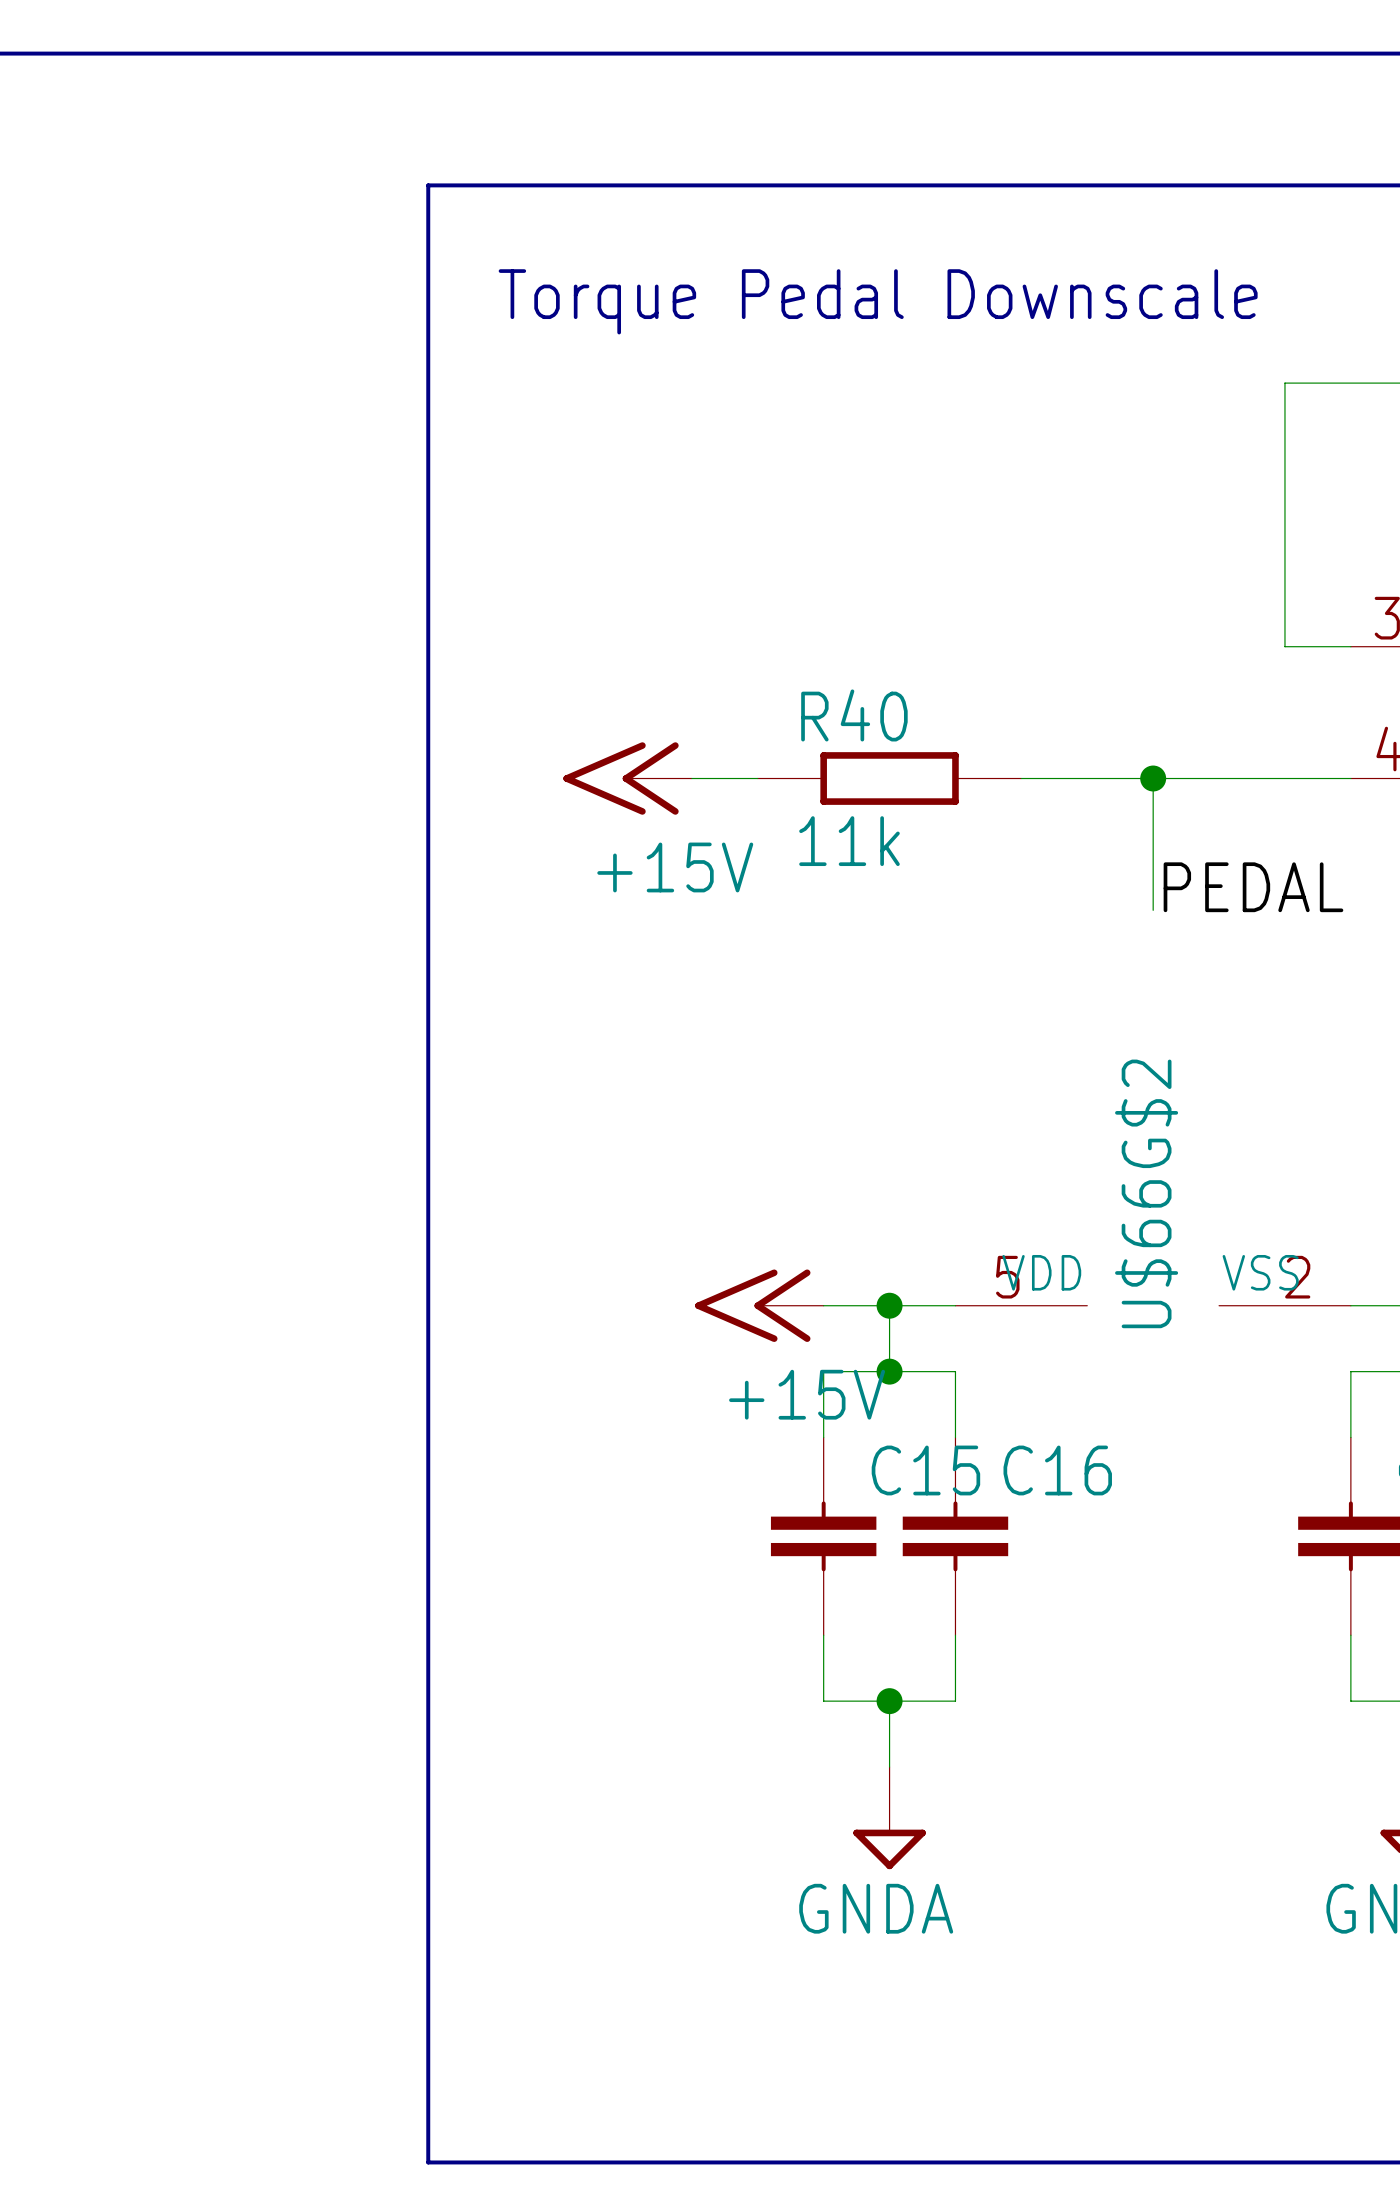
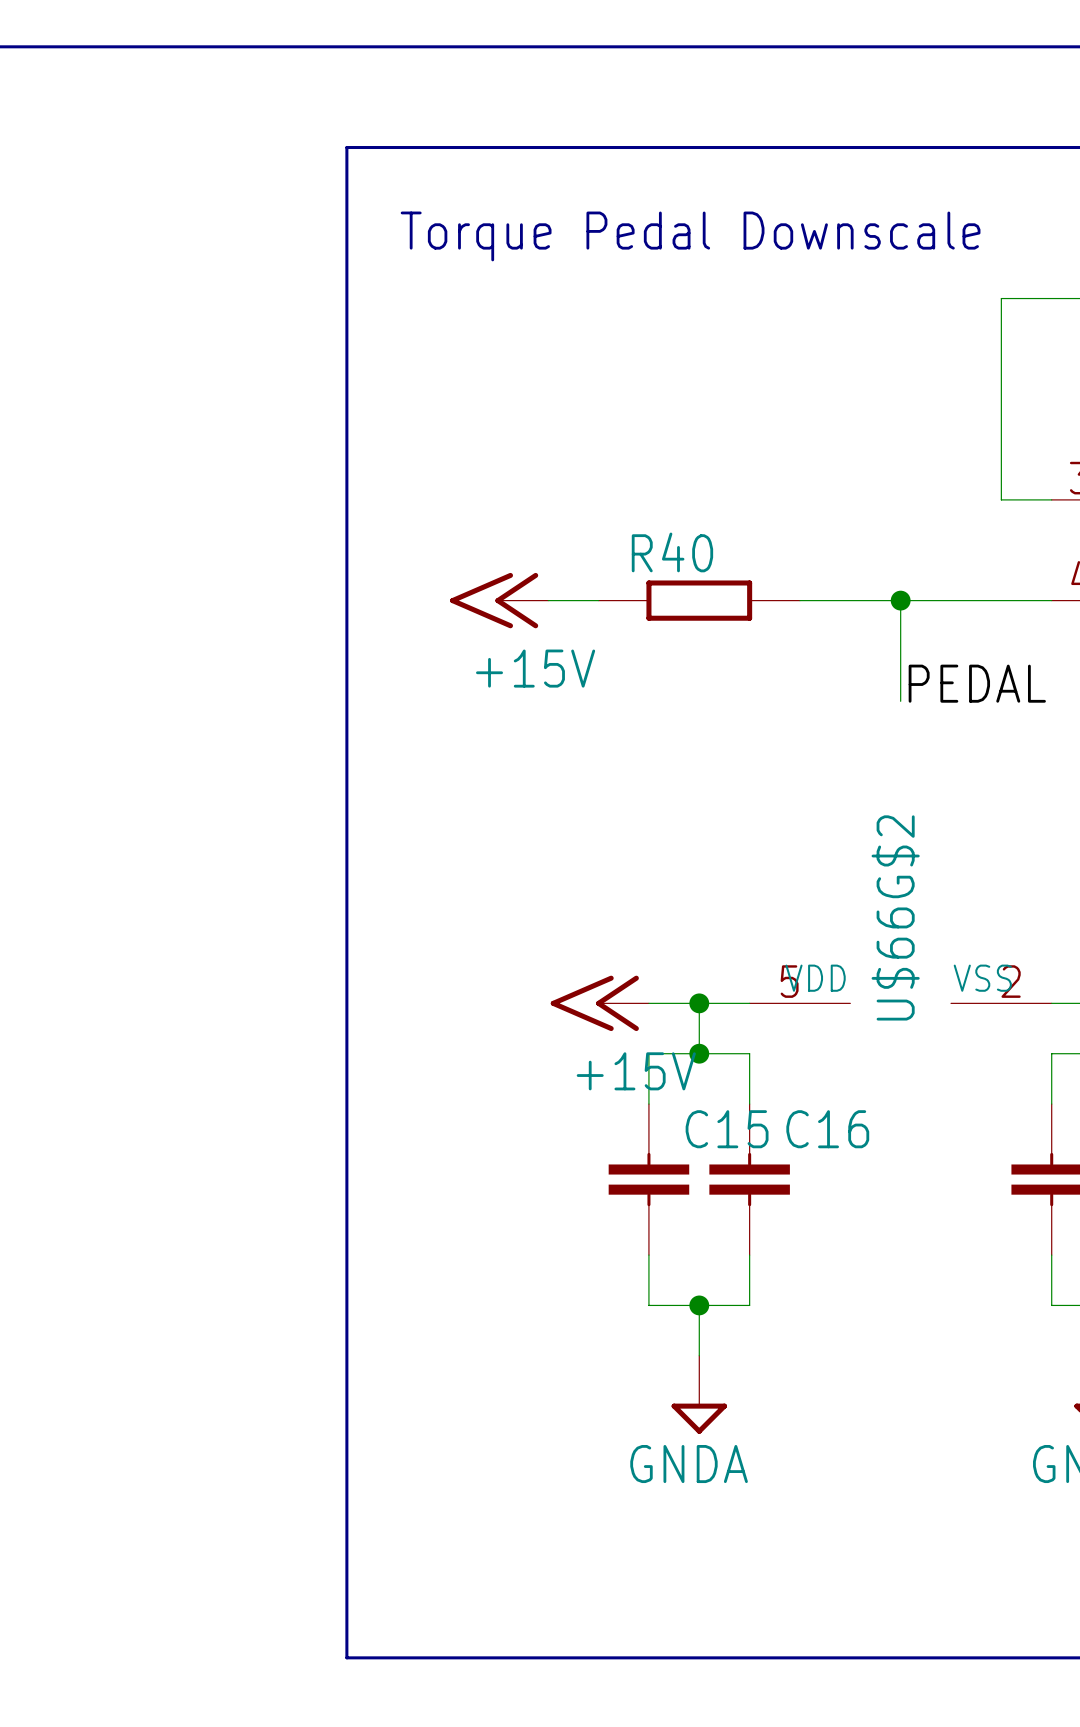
R40 value: 11k (849, 841) -> none

